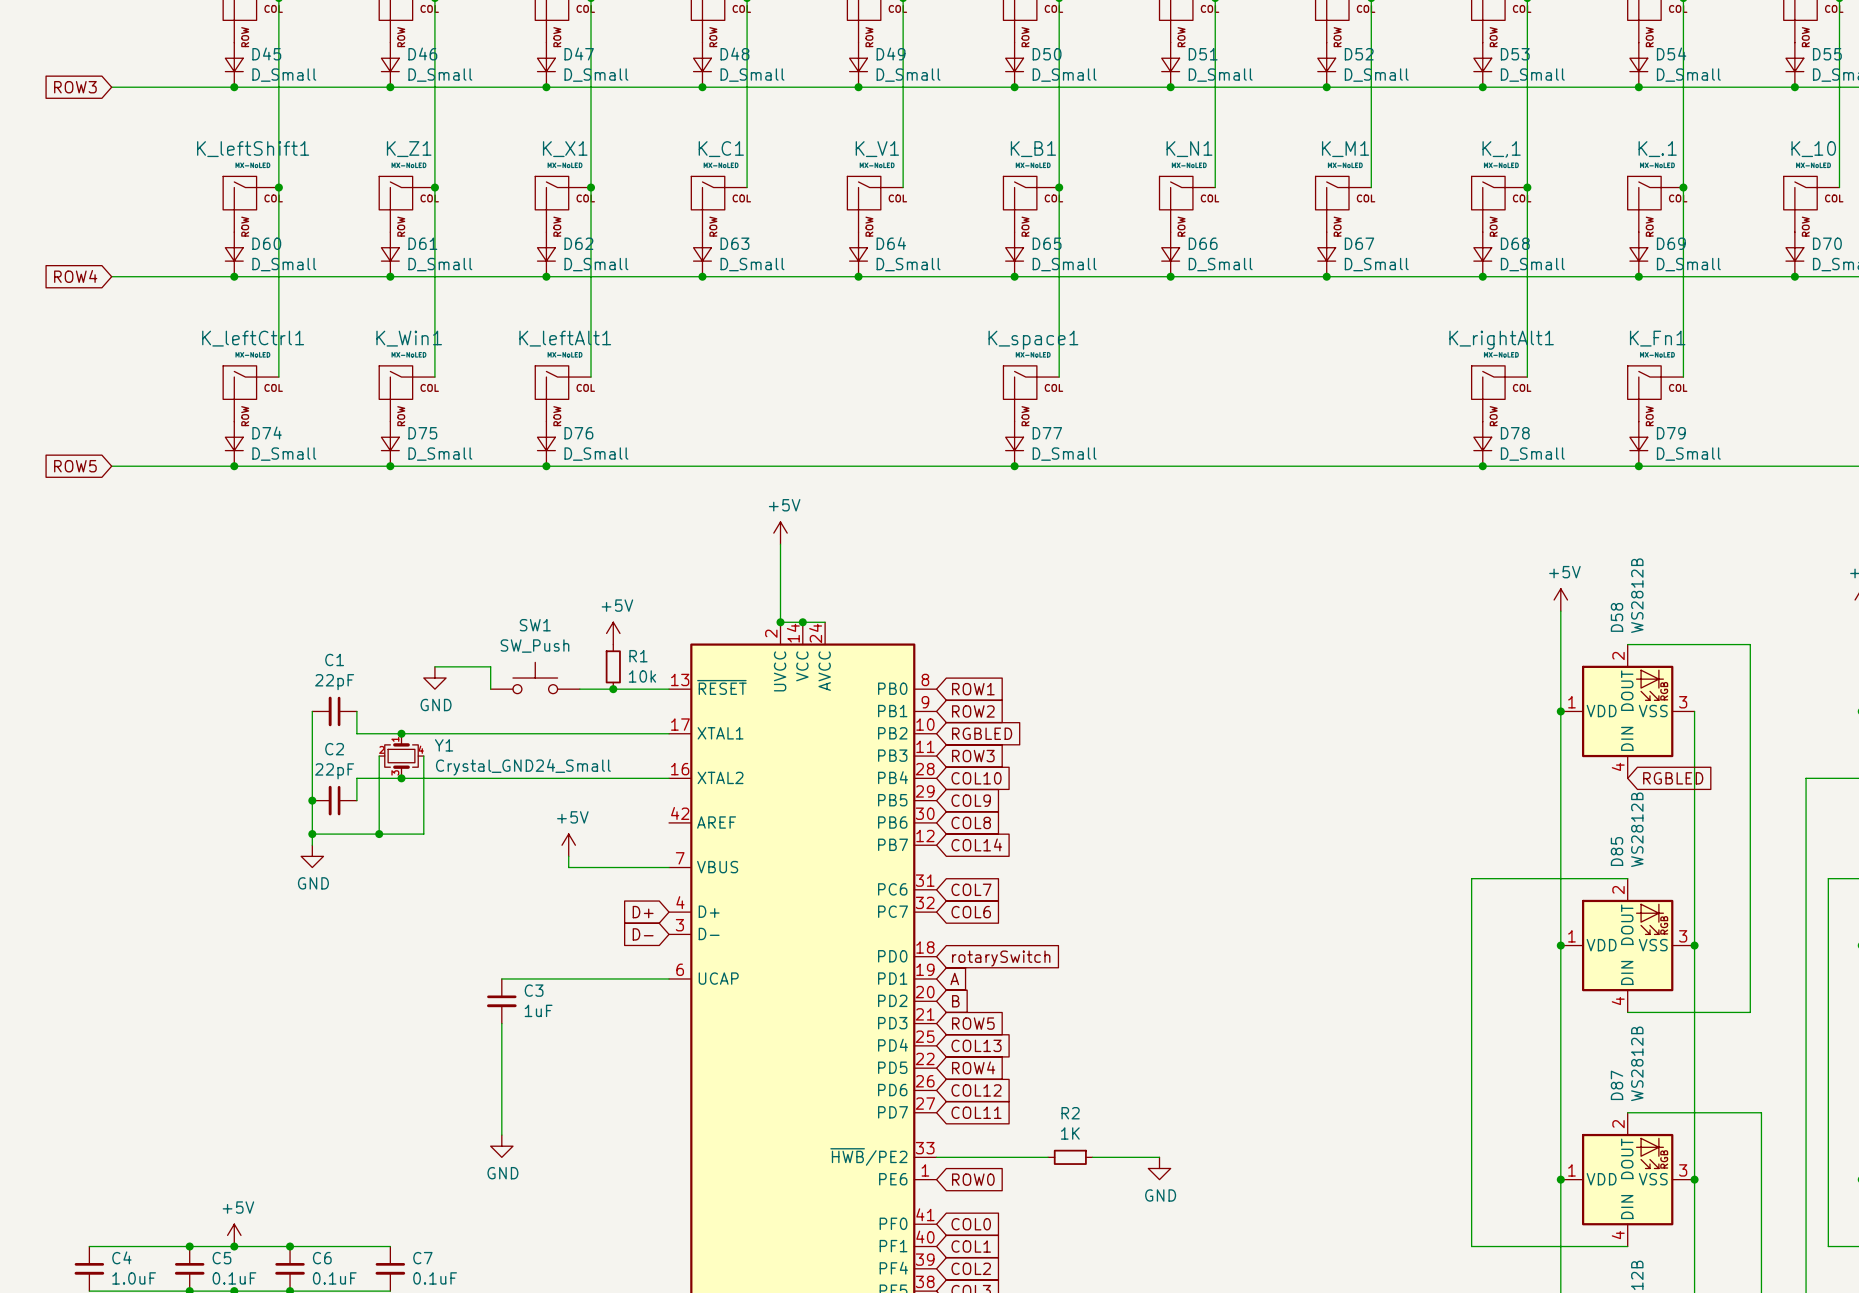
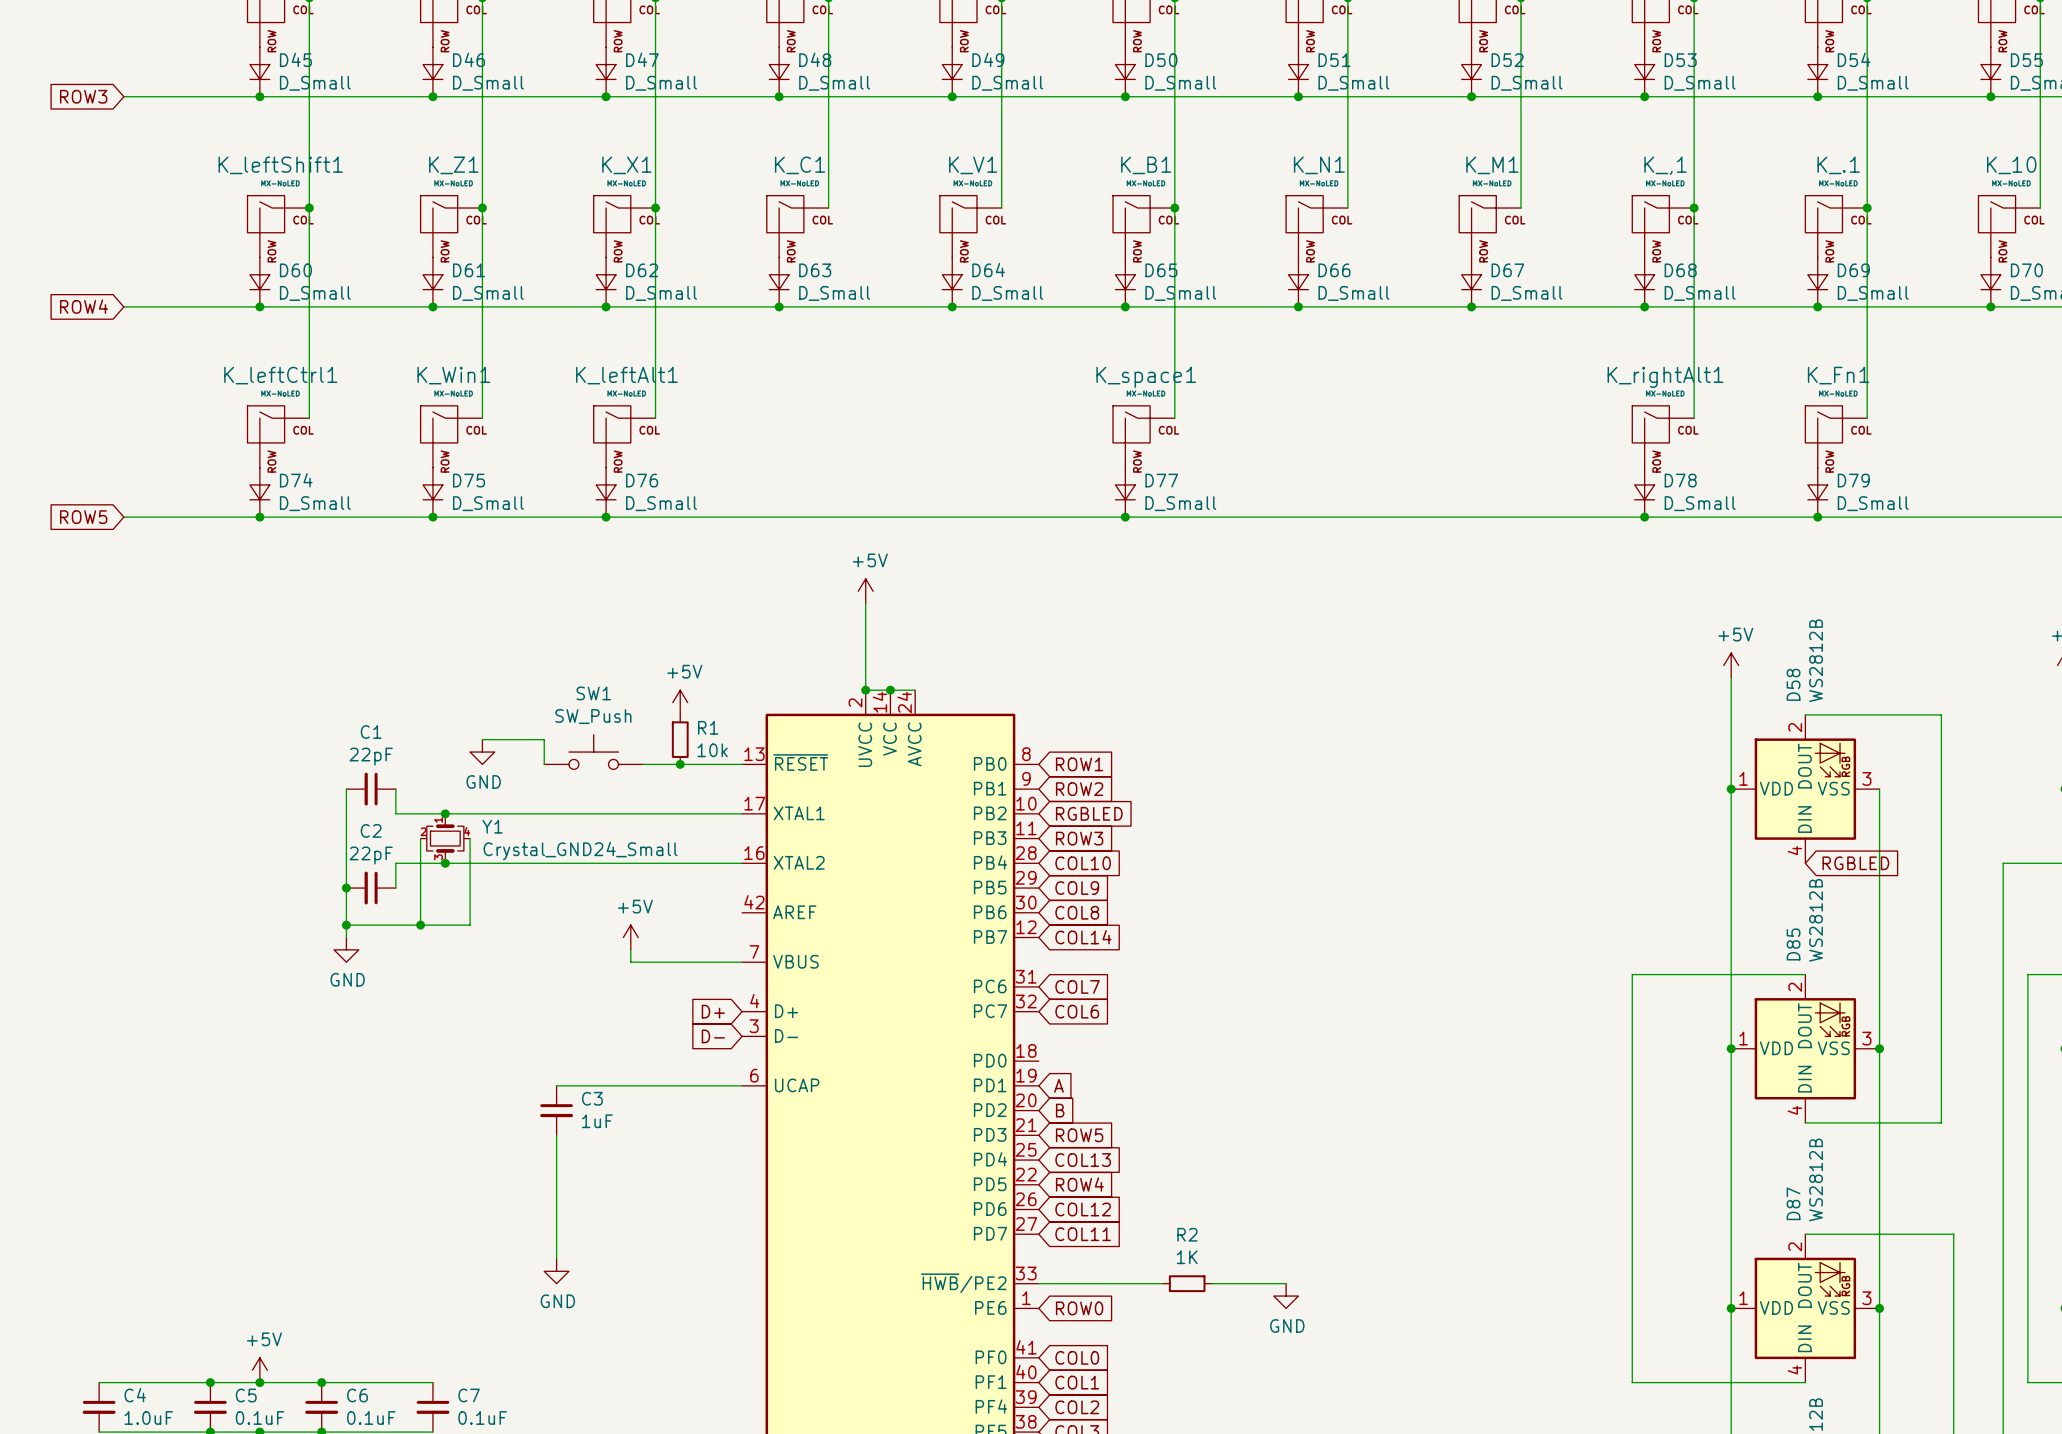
global label: rotarySwitch (1001, 958) -> none

